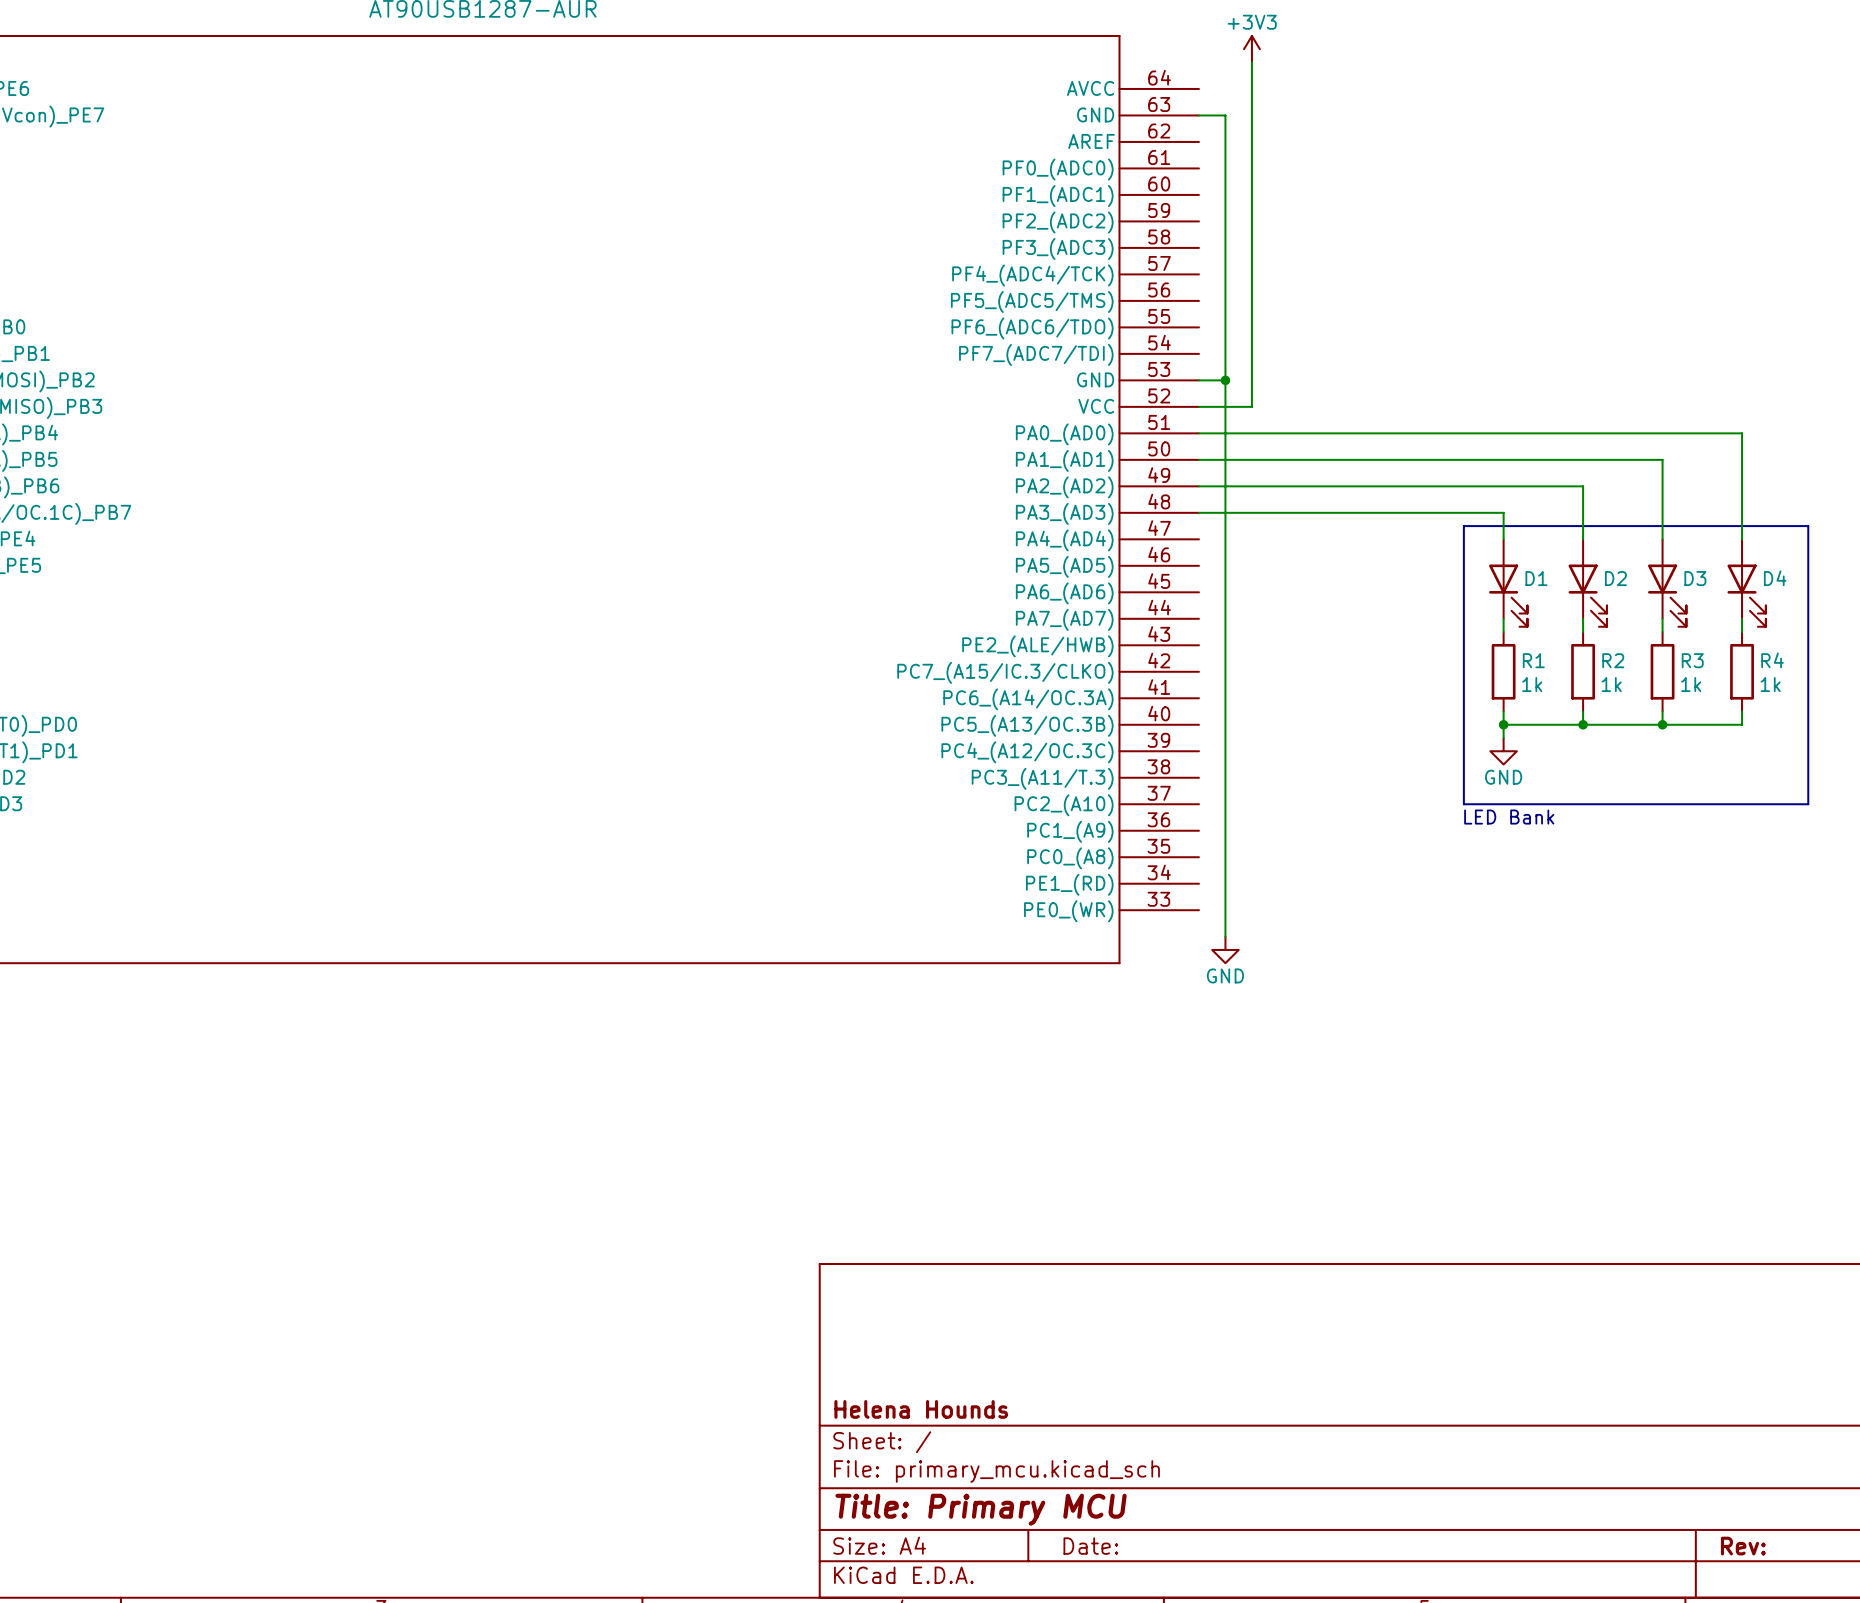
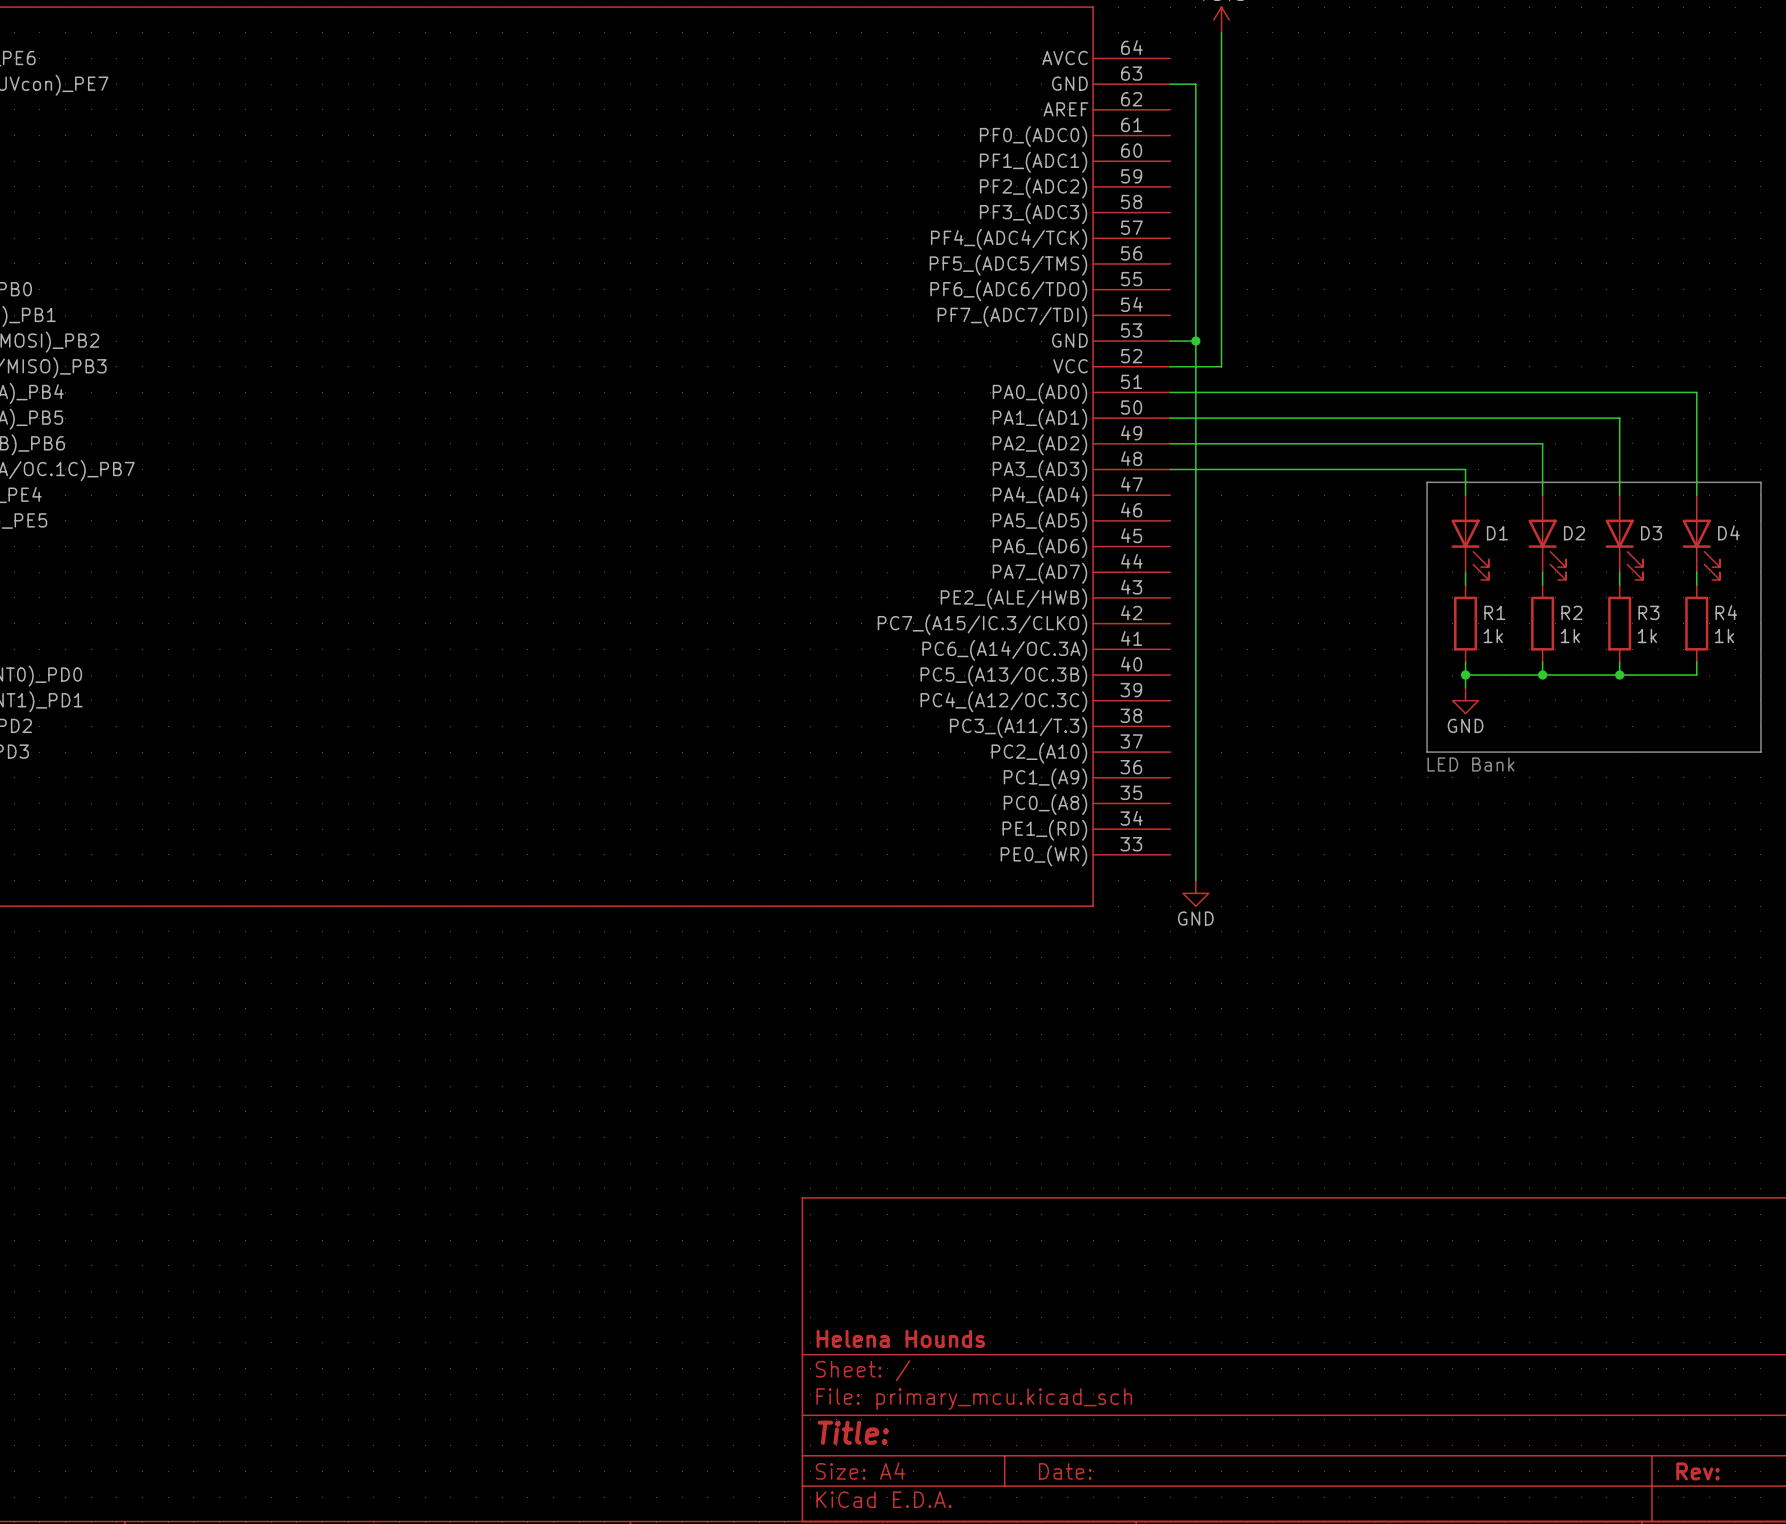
title block: Title: Primary MCU (981, 1509) -> Title: (853, 1432)

